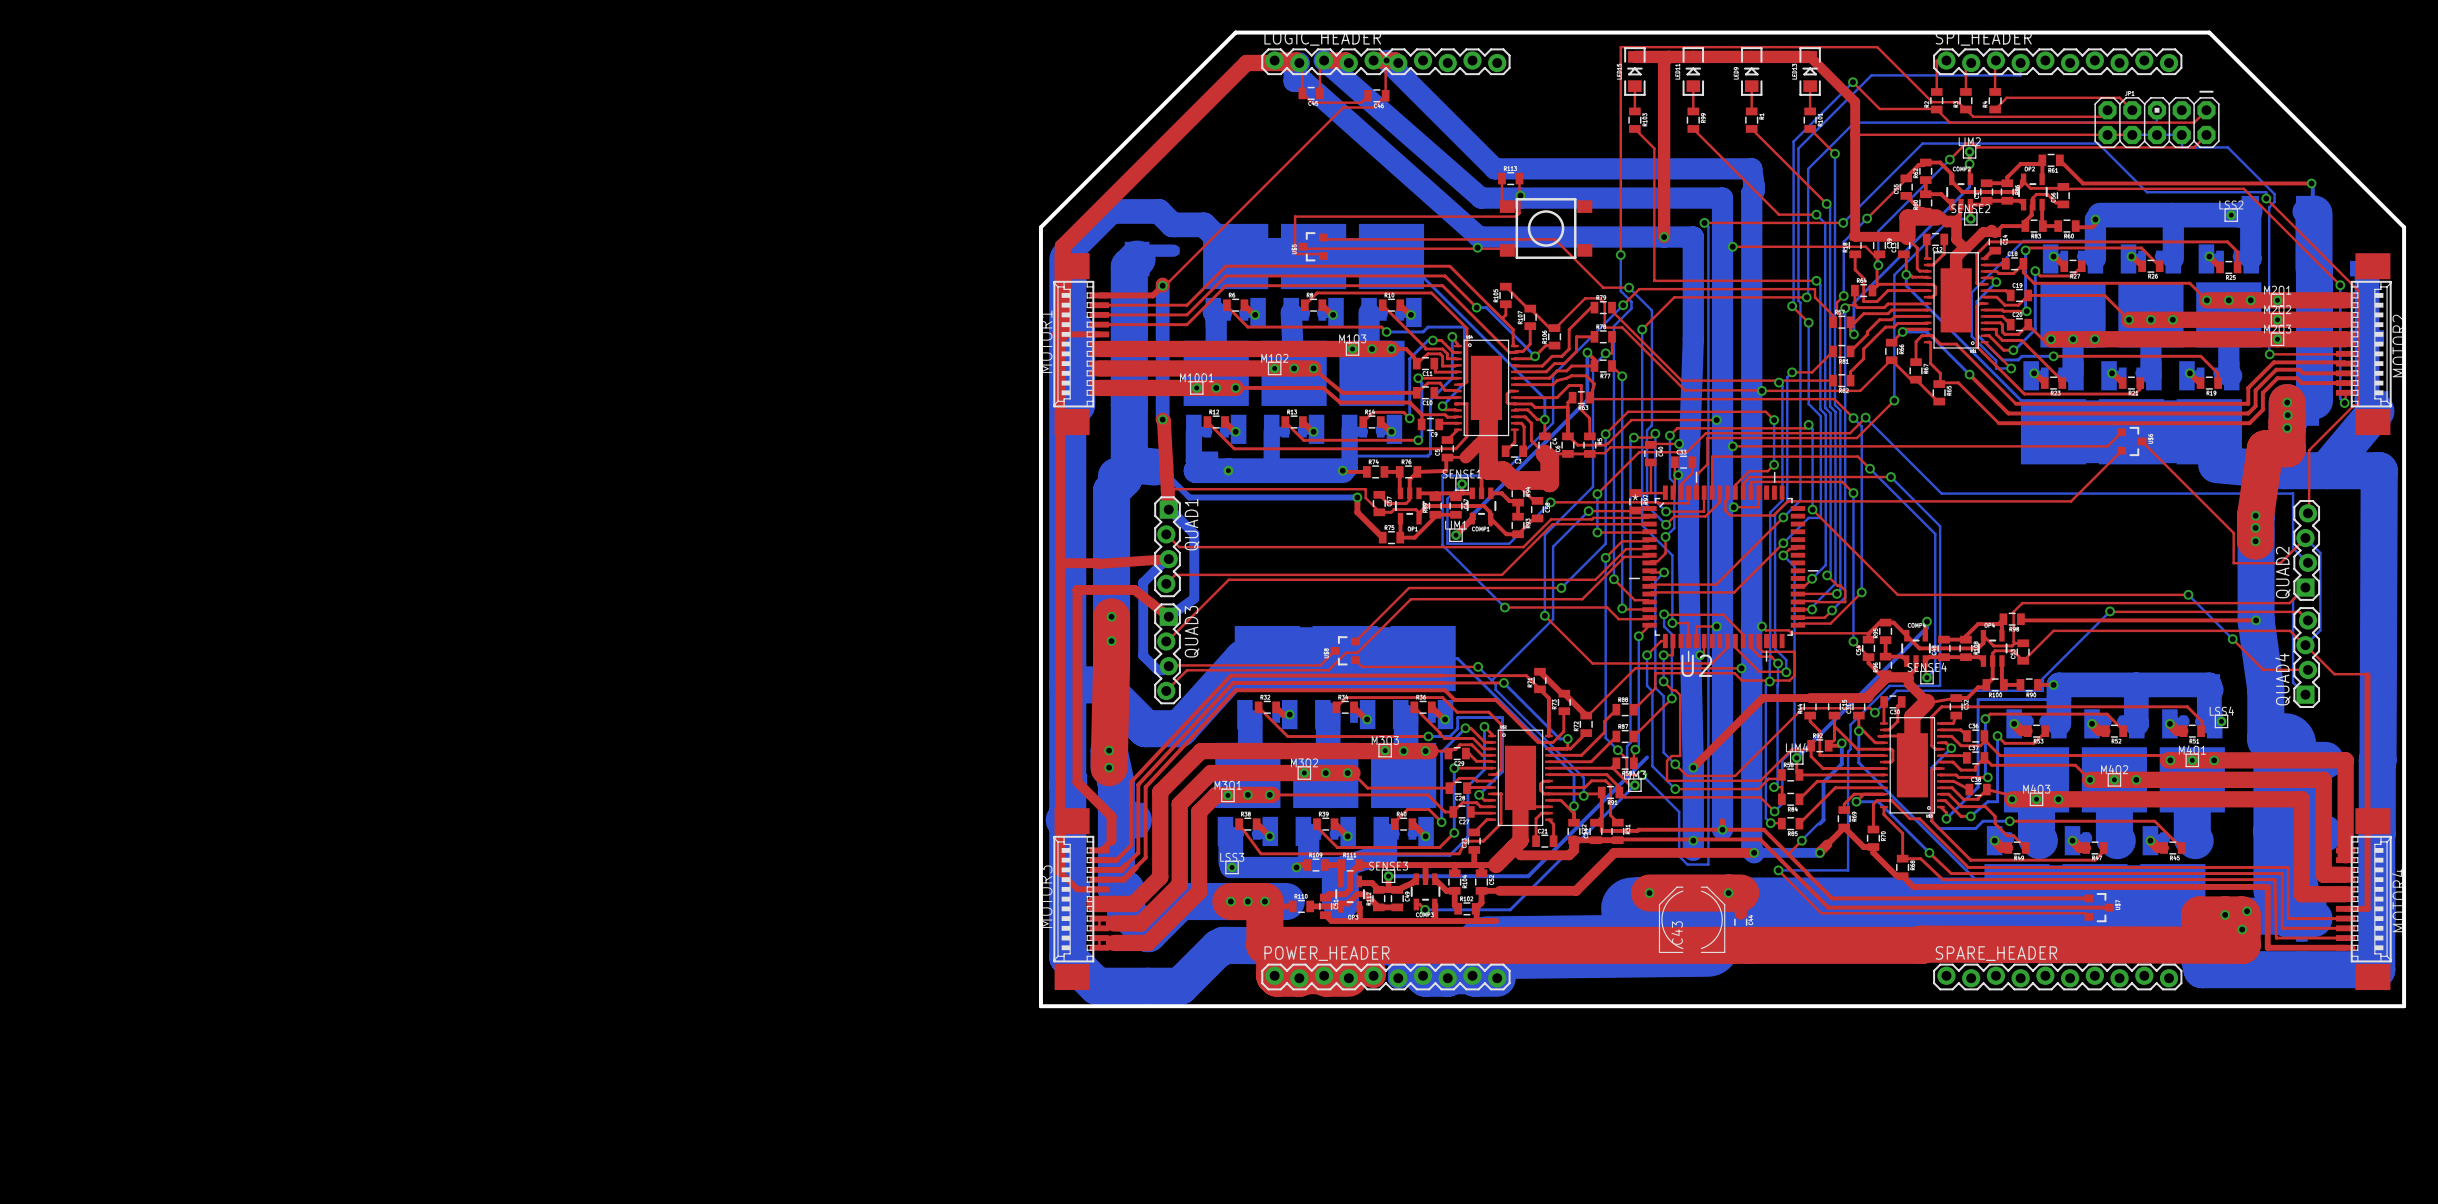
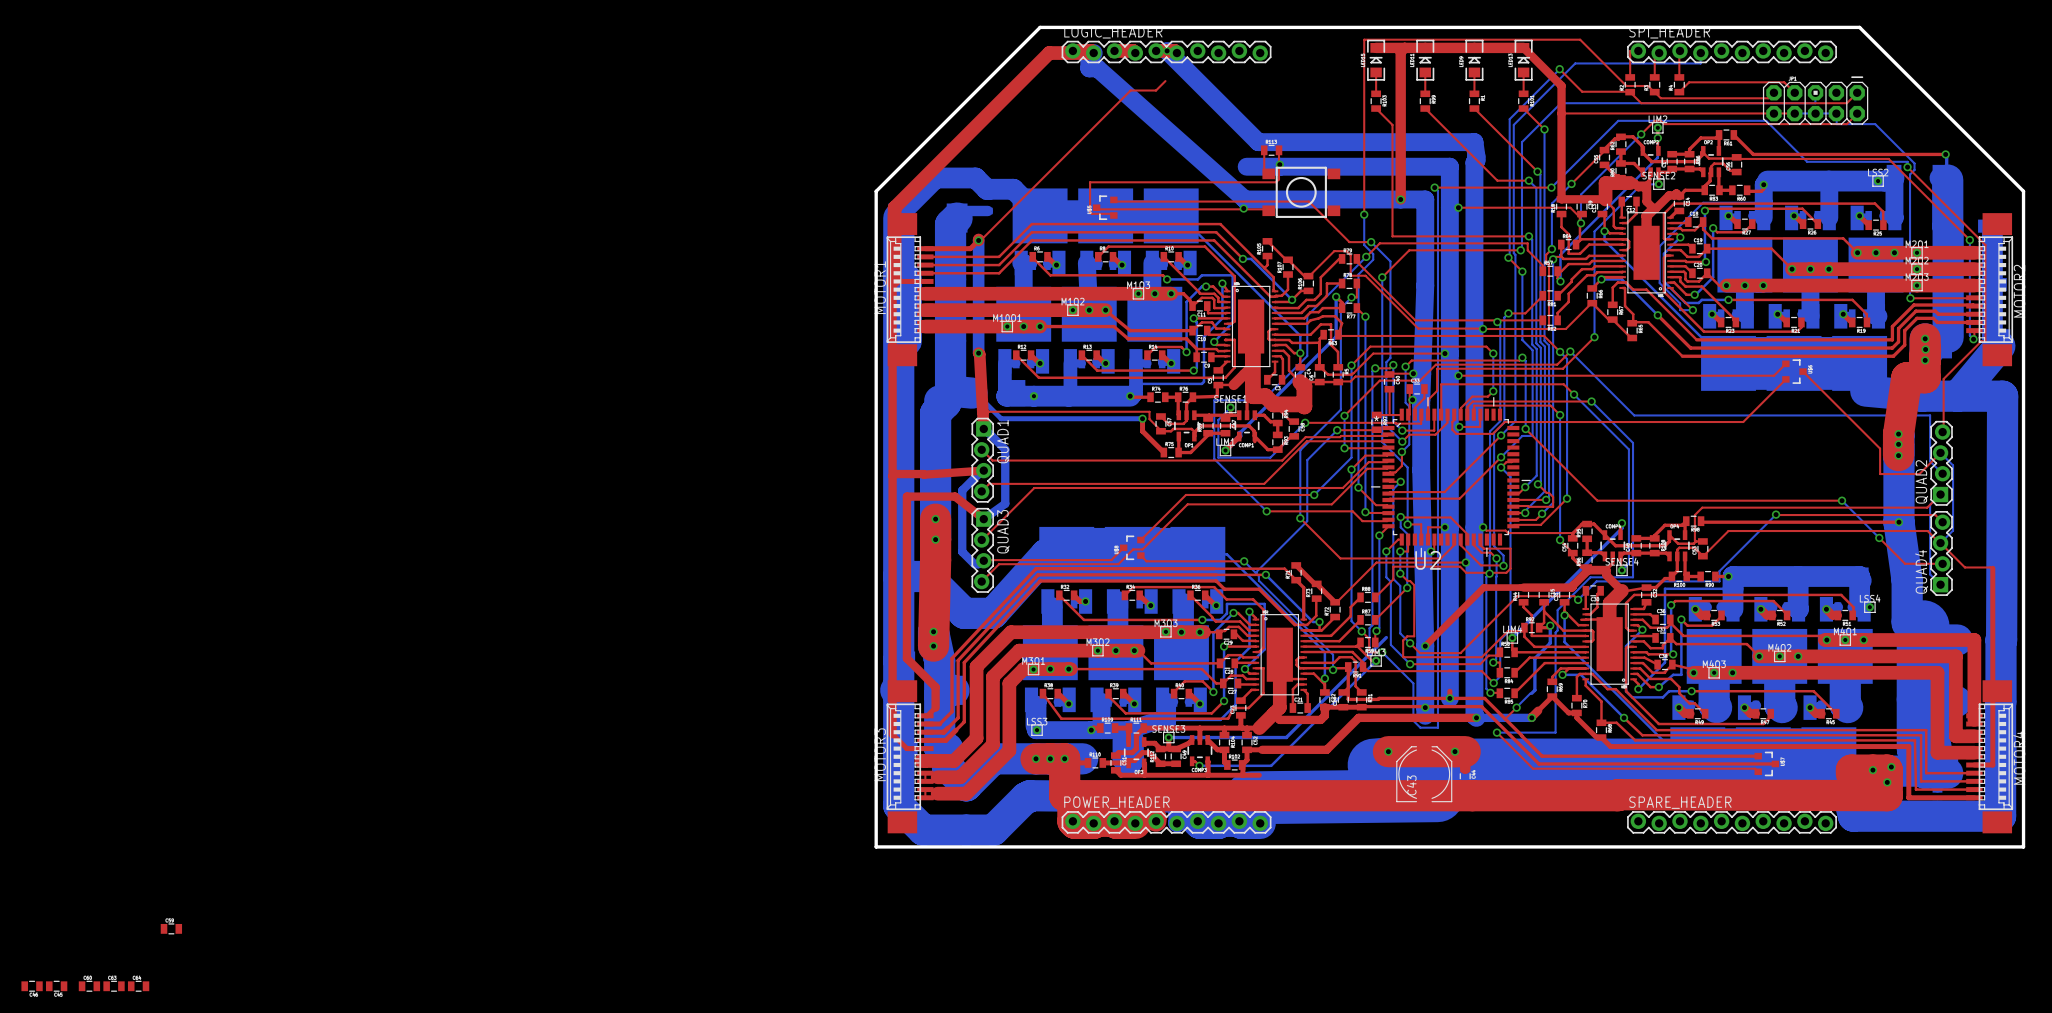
bottom track: (1324, 60) (1481, 198) -> none
top track: (1319, 67) (1319, 93) -> none
top track: (1385, 68) (1384, 96) -> none
top track: (1302, 70) (1302, 93) (1312, 102) (1361, 102) (1368, 95) -> none
part position: (1311, 93) -> (56, 986)
part position: (1376, 95) -> (32, 986)
part: none -> (171, 928)
part: none -> (89, 986)
part: none -> (114, 986)
part: none -> (138, 986)

